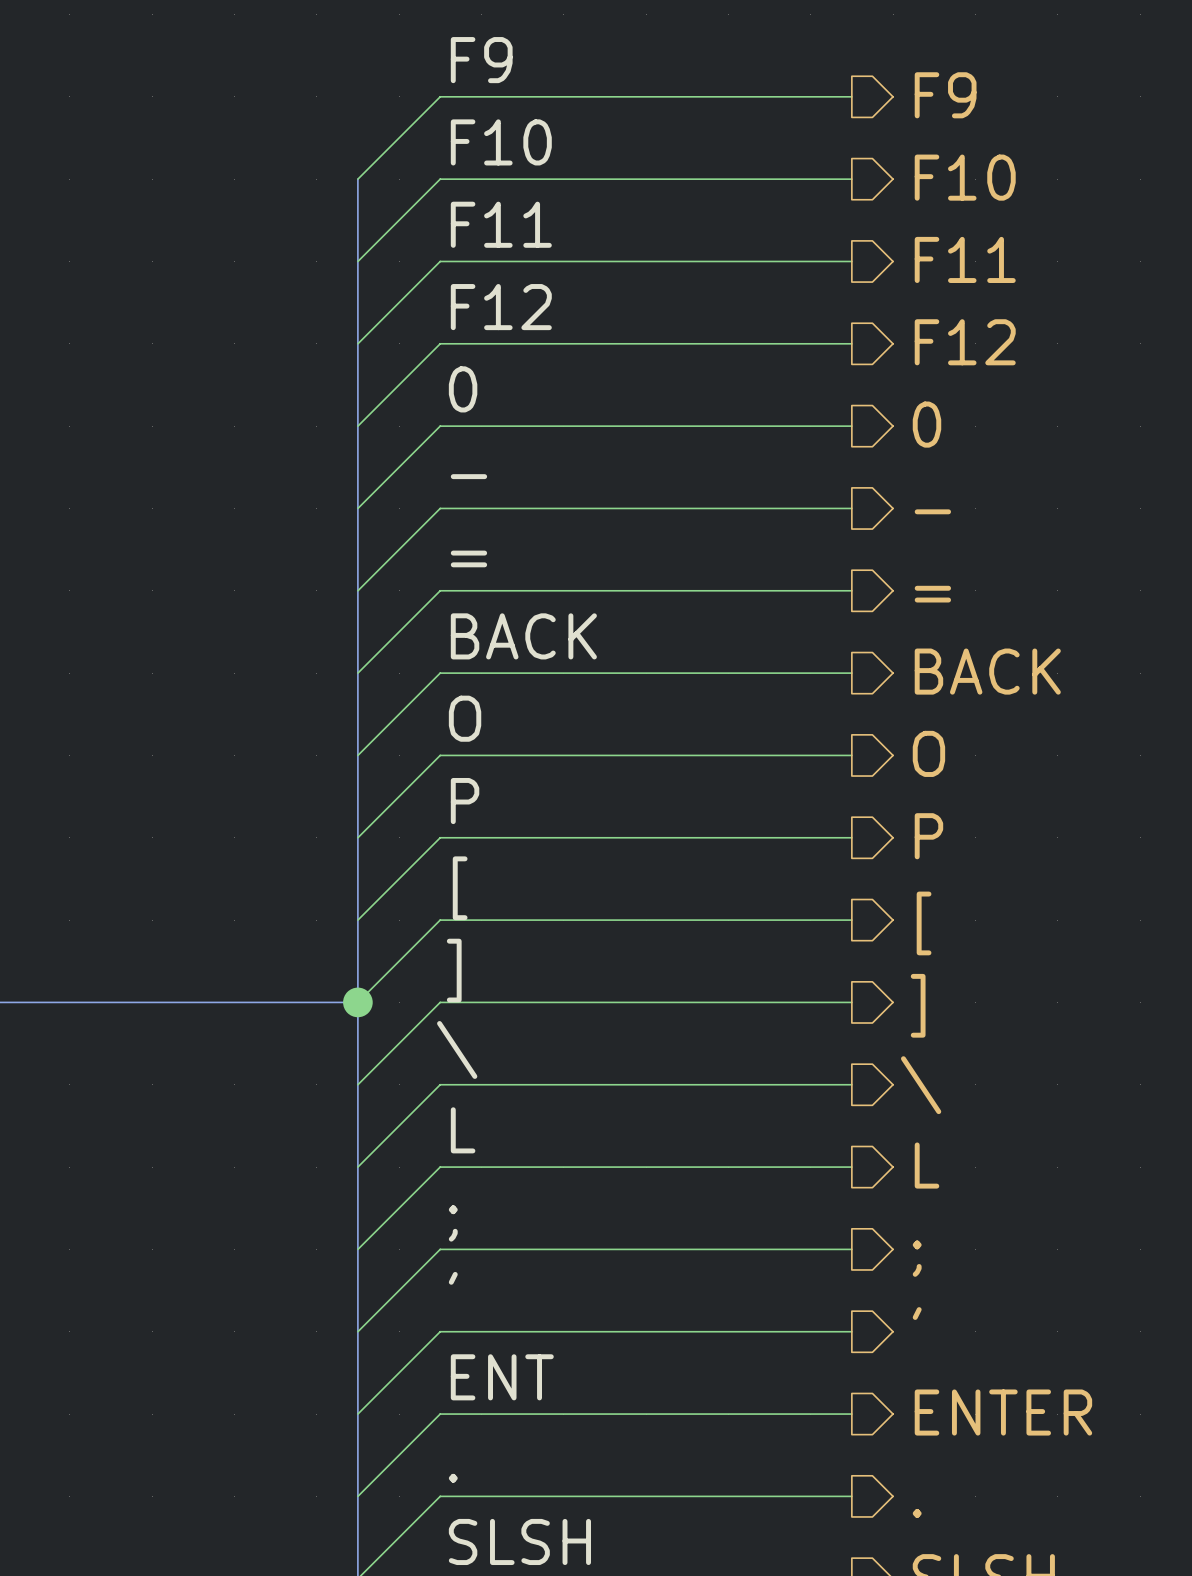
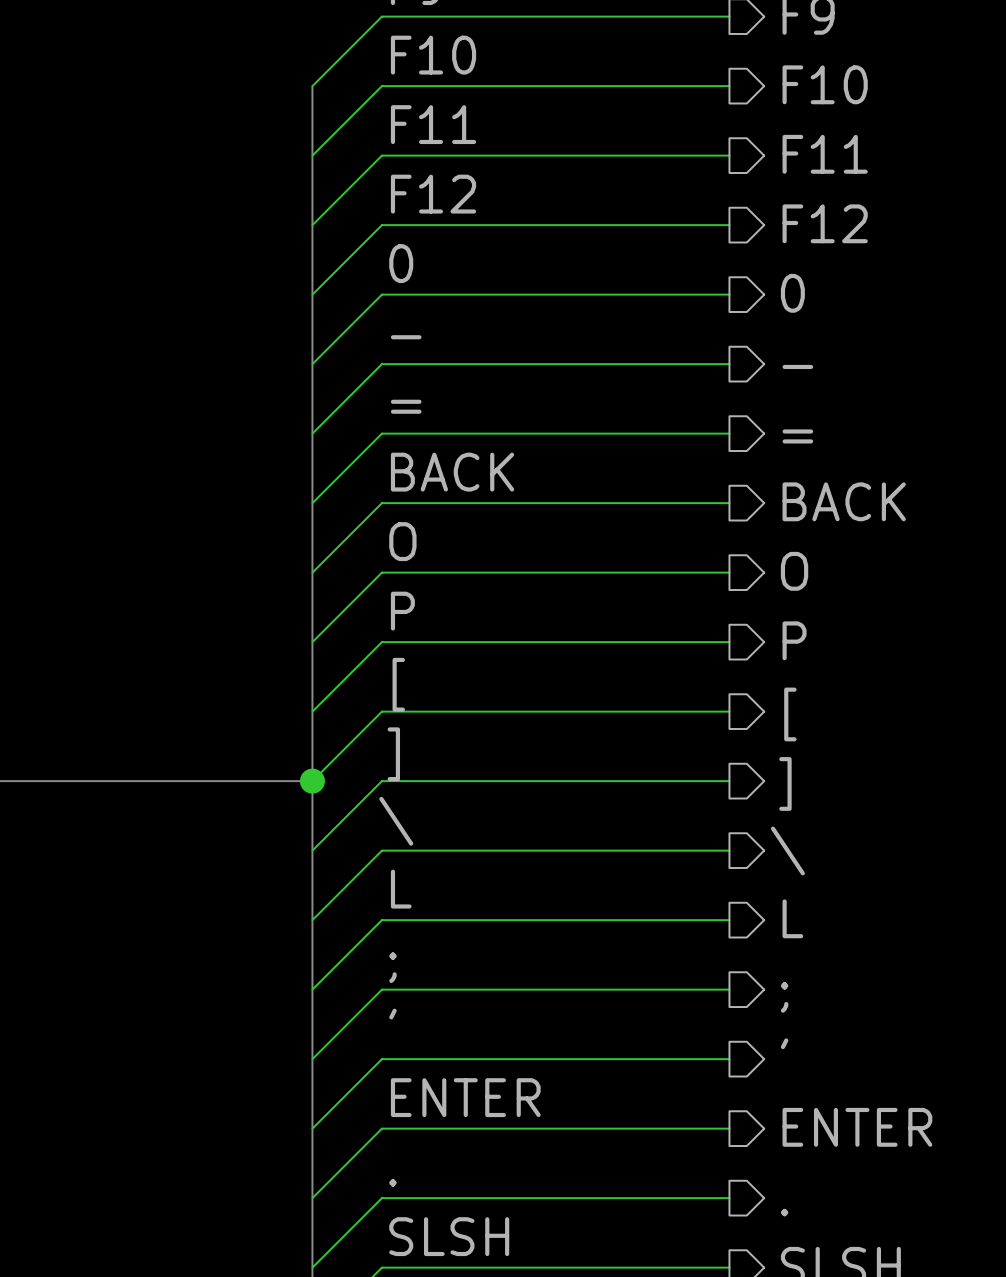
label: ENT (502, 1377) -> ENTER (465, 1097)

